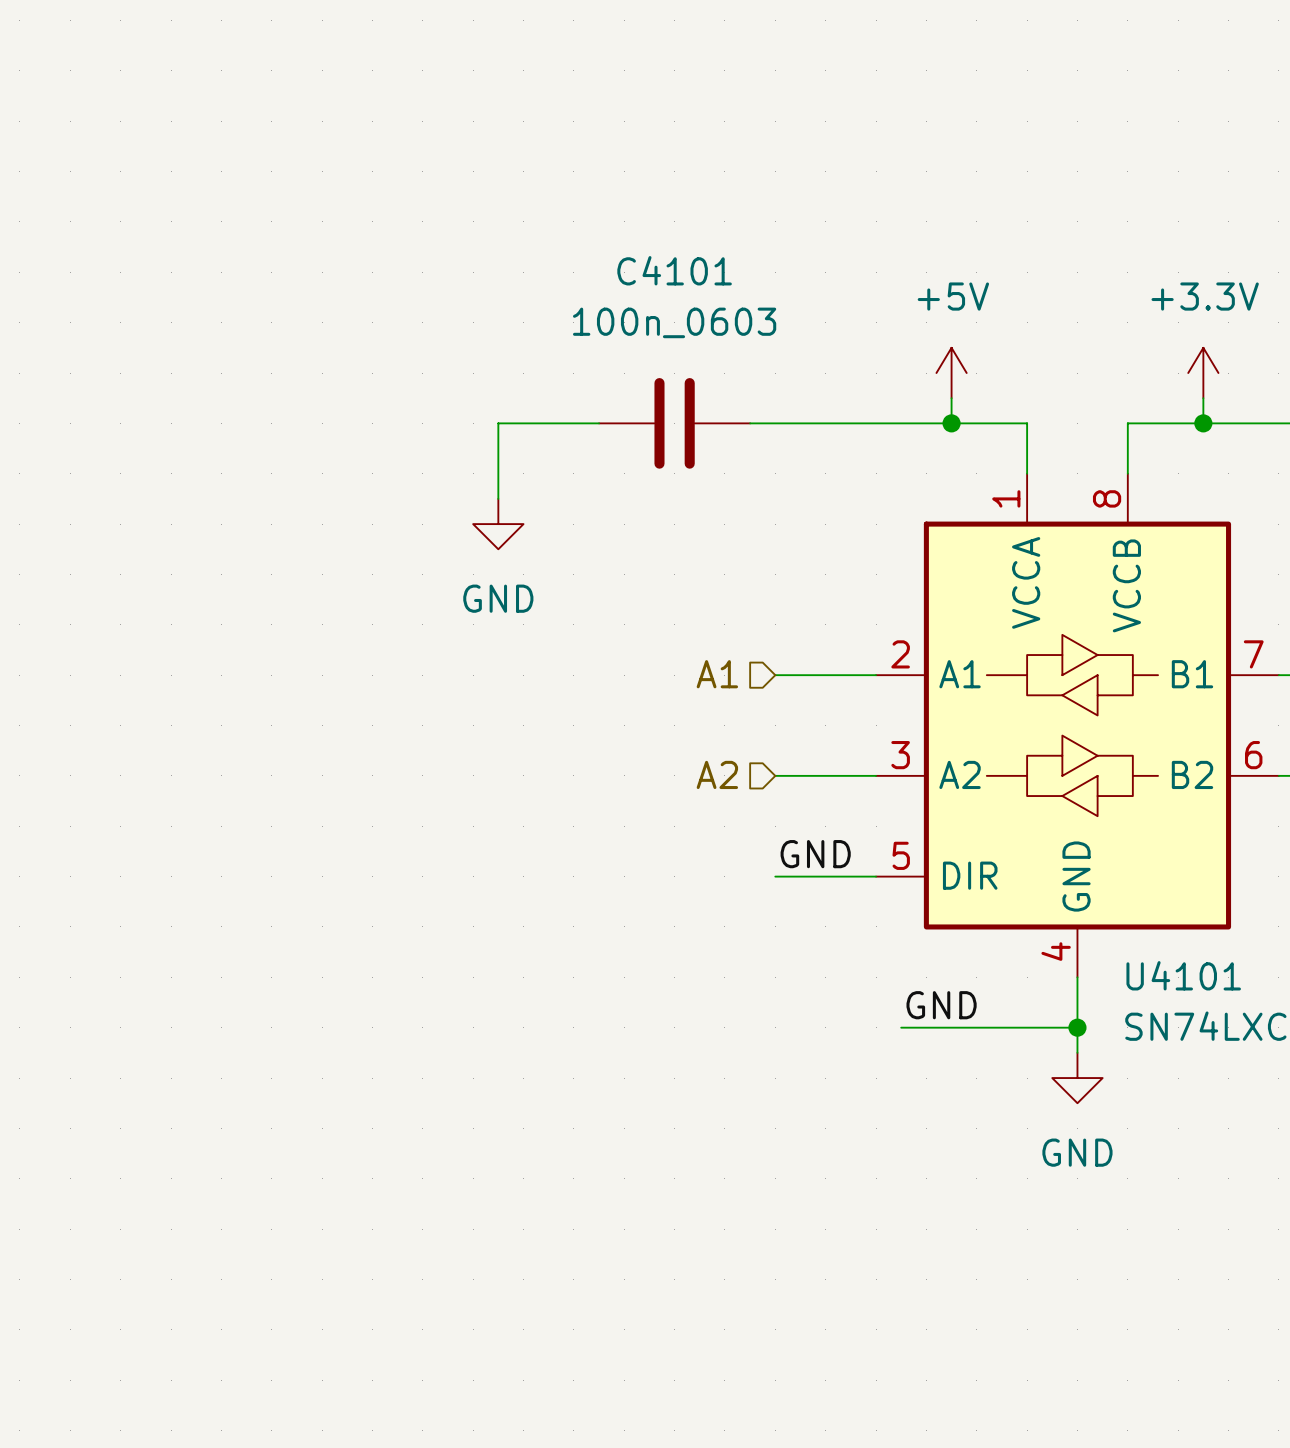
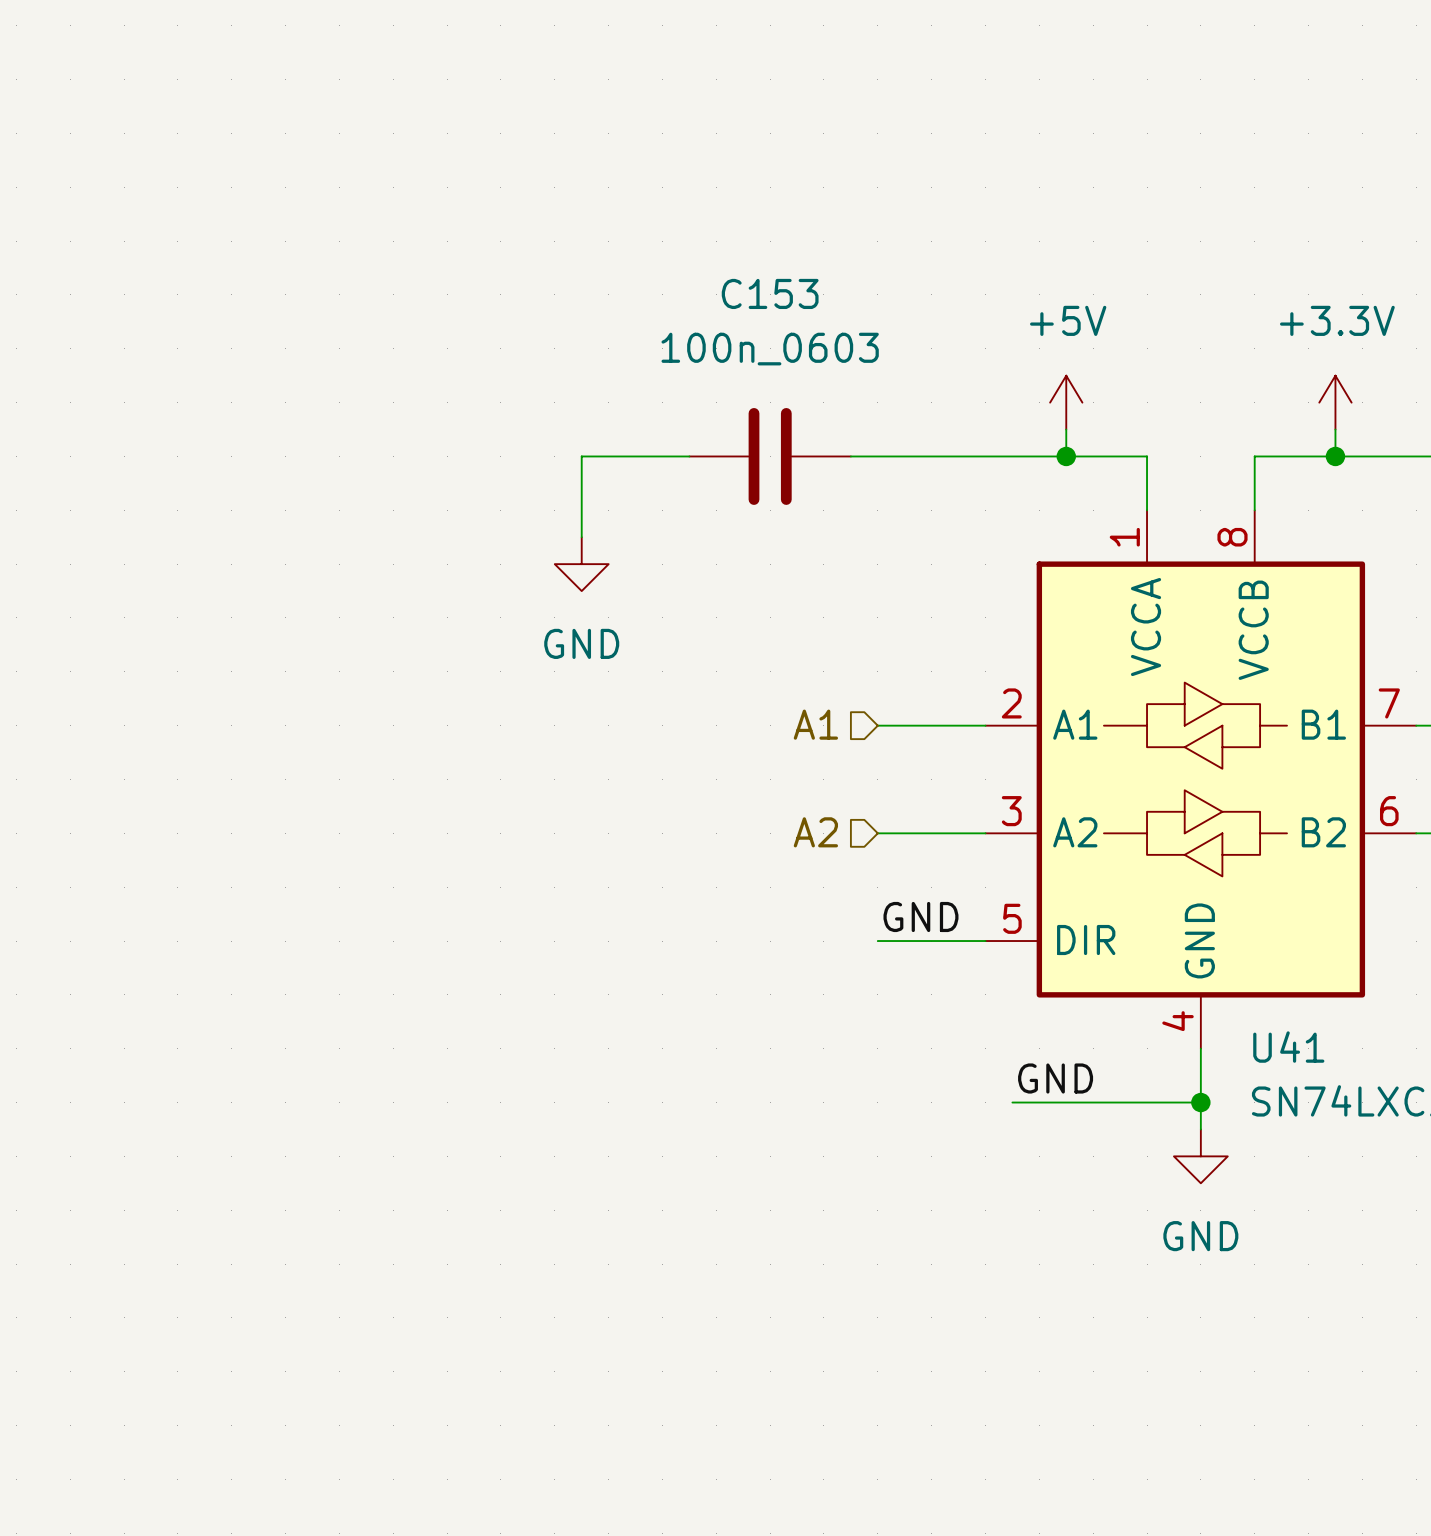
C4101 name: C4101 (674, 270) -> C153 (770, 293)
U4101 name: U4101 (1183, 975) -> U41 (1288, 1047)

